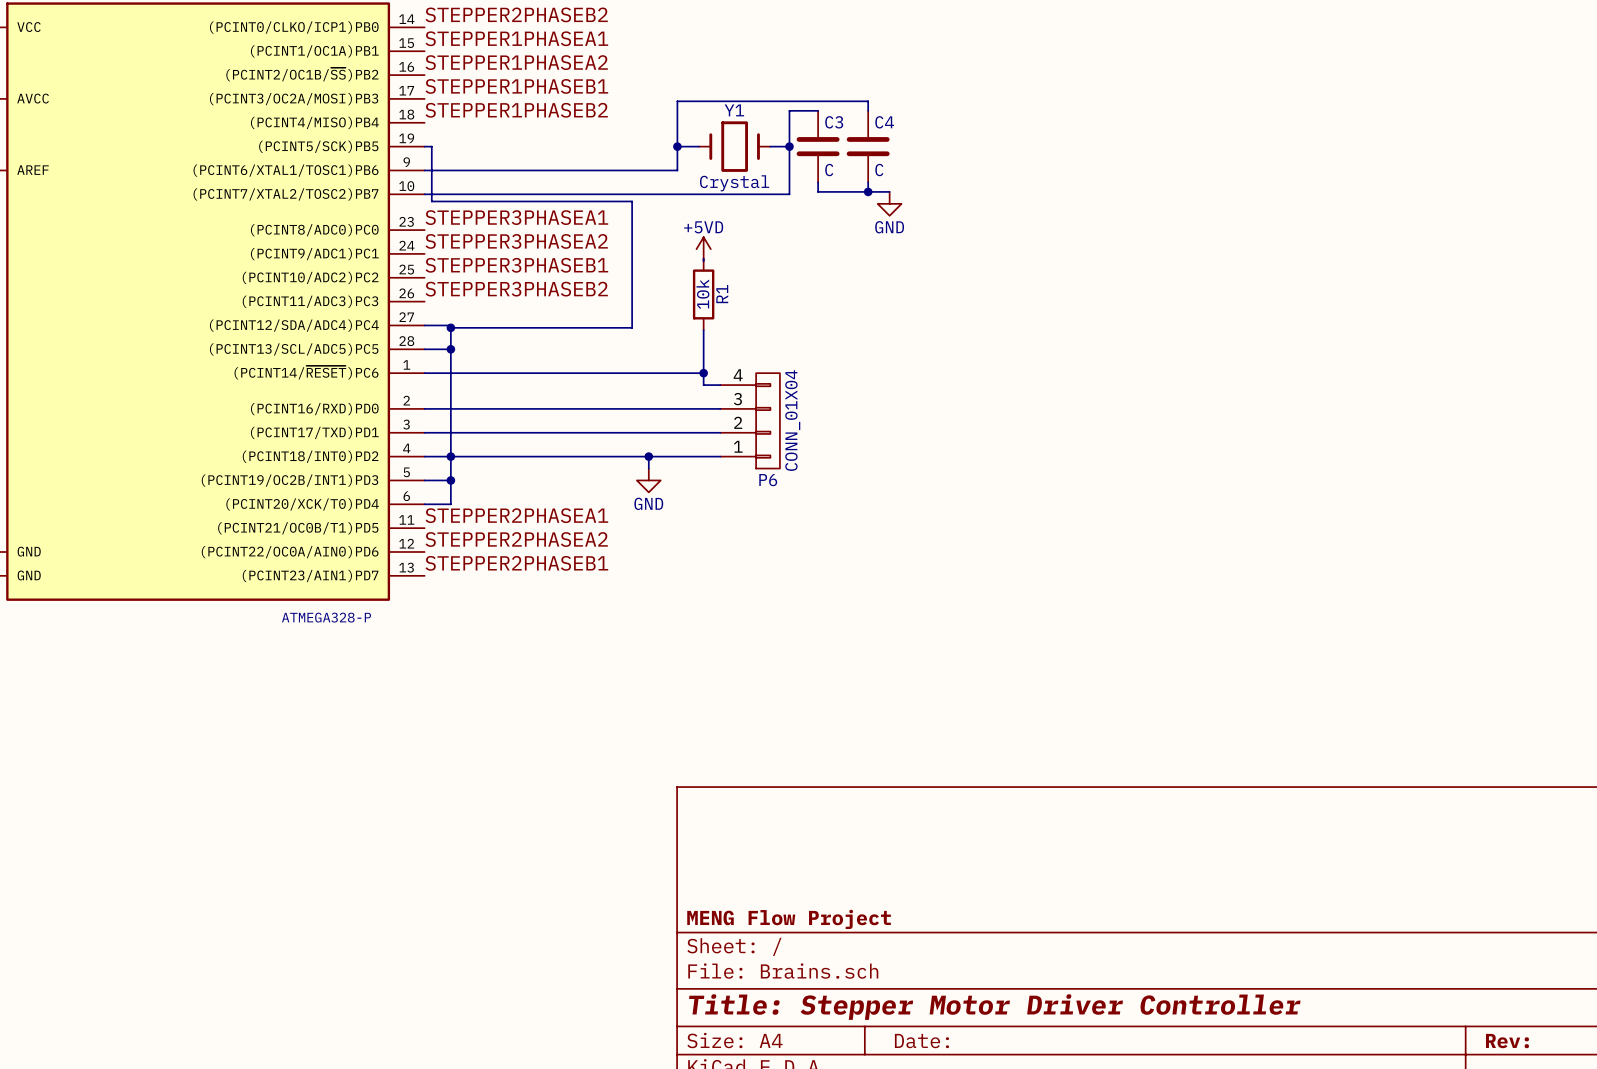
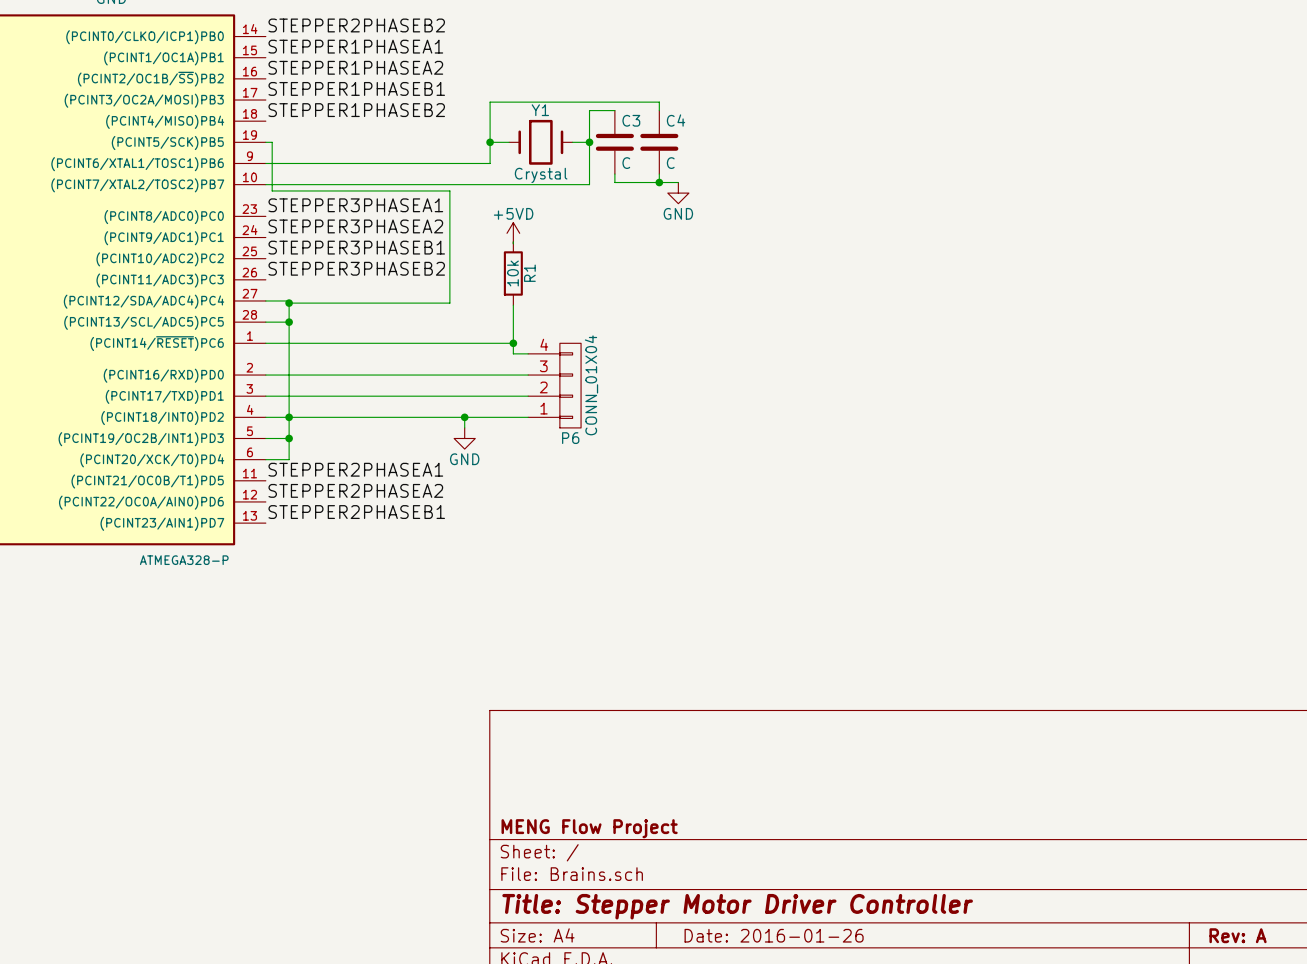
title block: Date: (921, 1041) -> Date: 2016-01-26 (774, 935)
title block: Rev: (1507, 1041) -> Rev: A (1238, 935)

